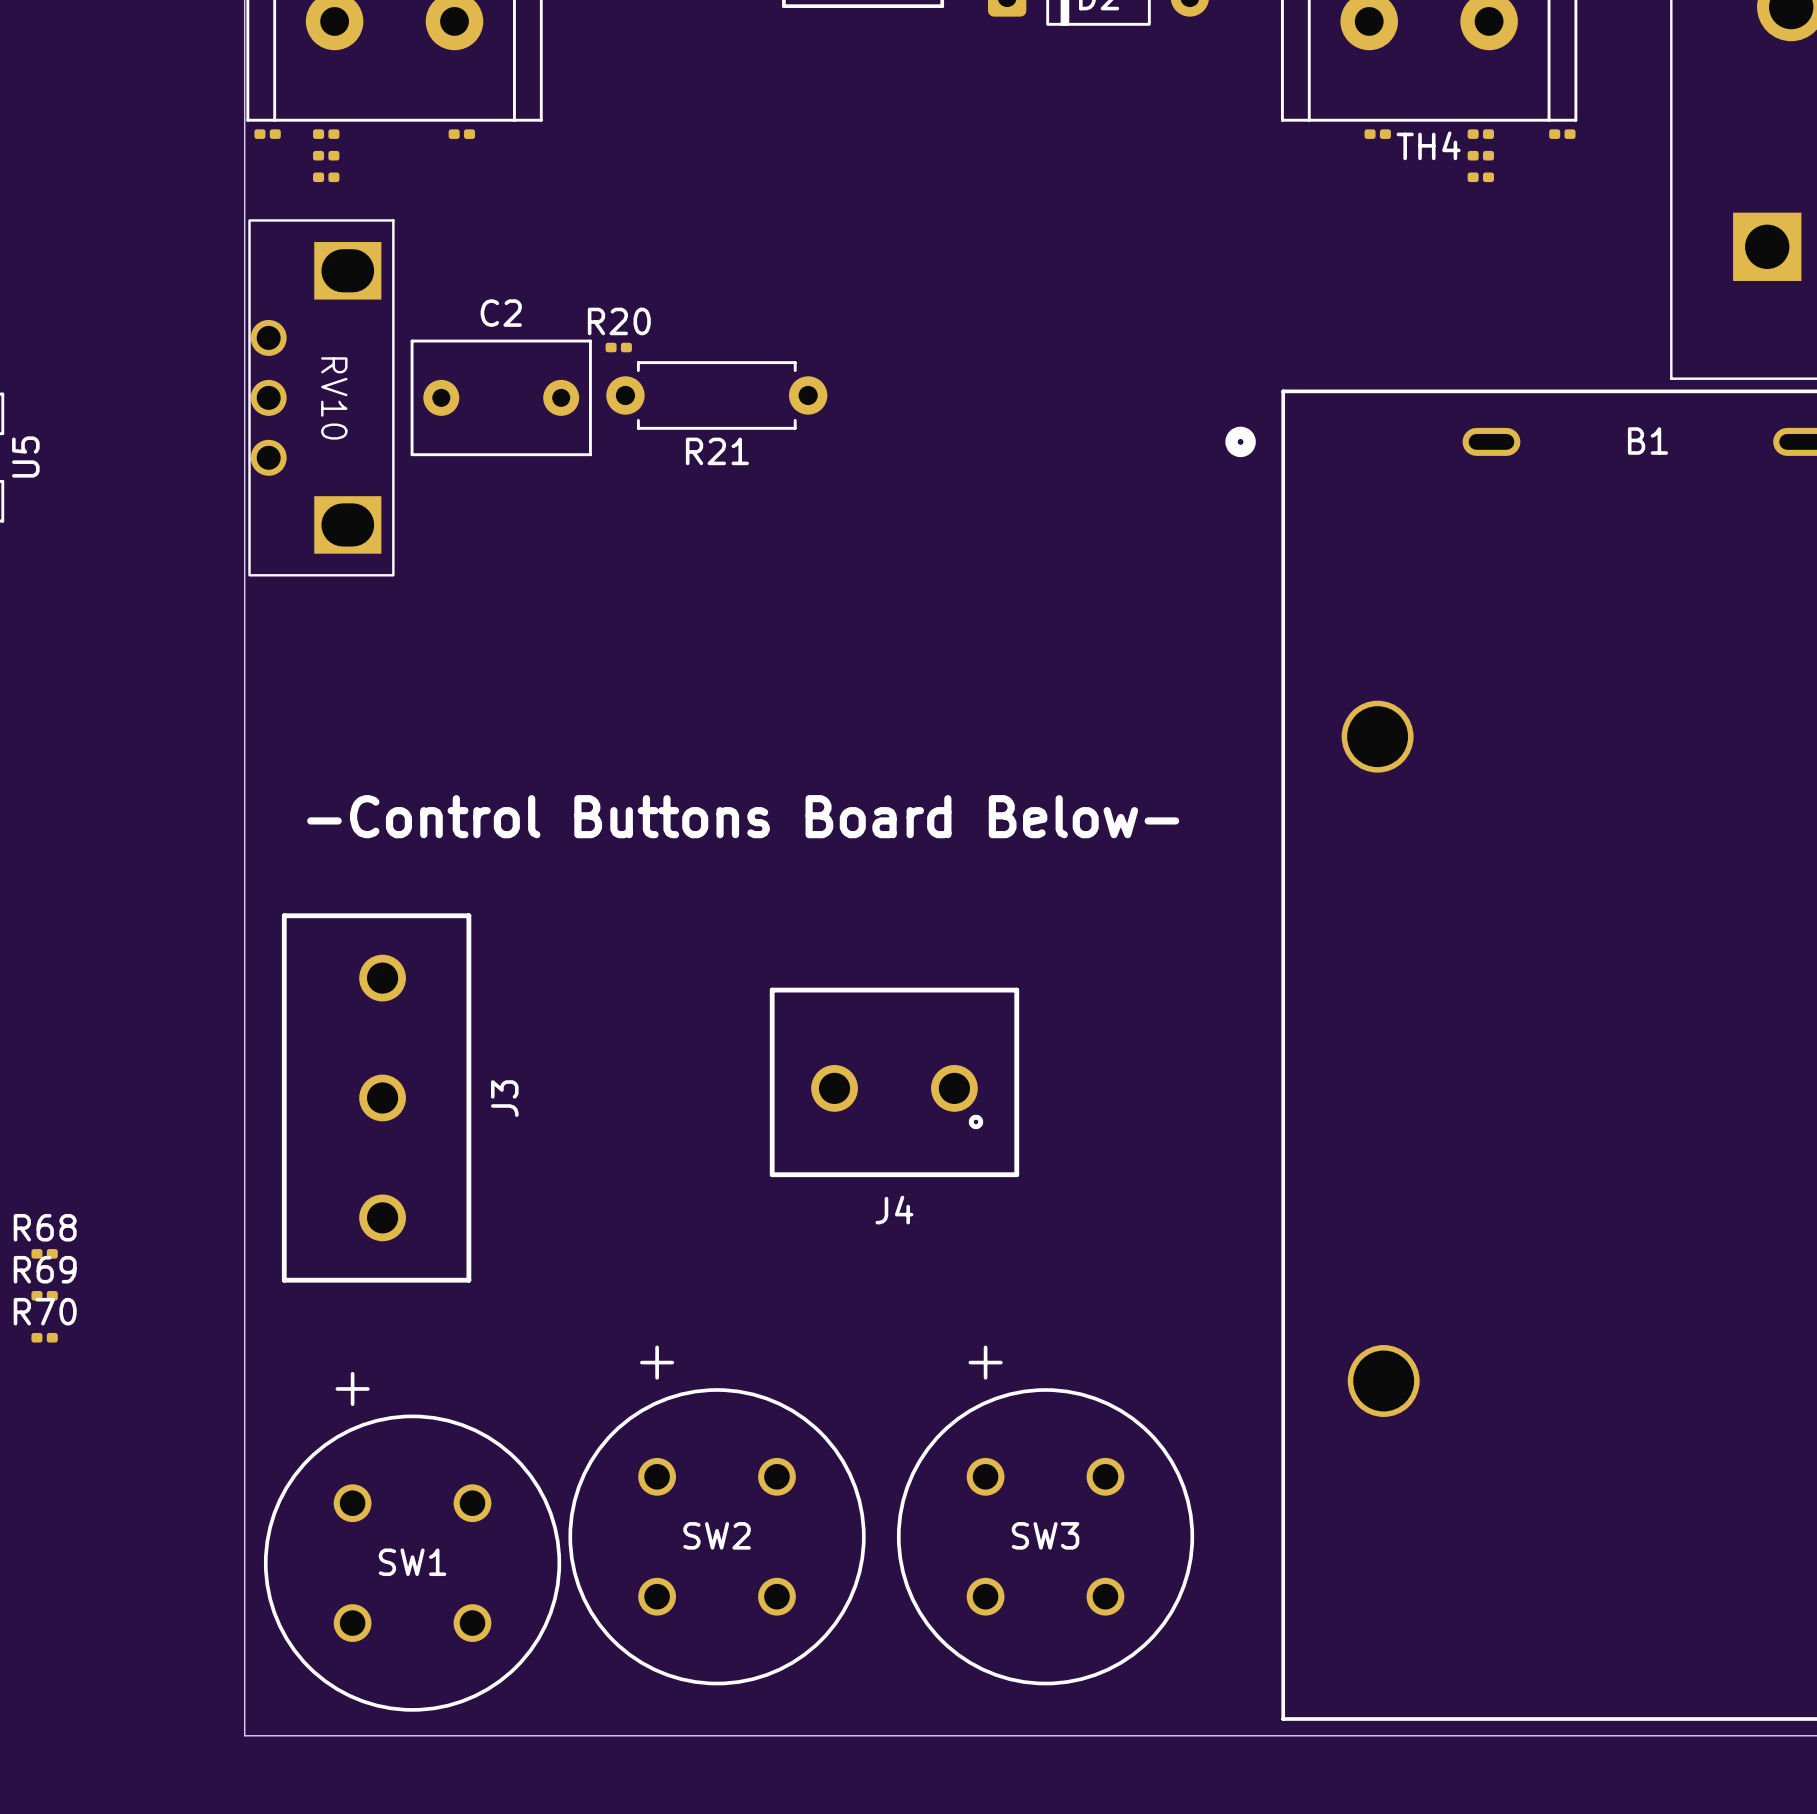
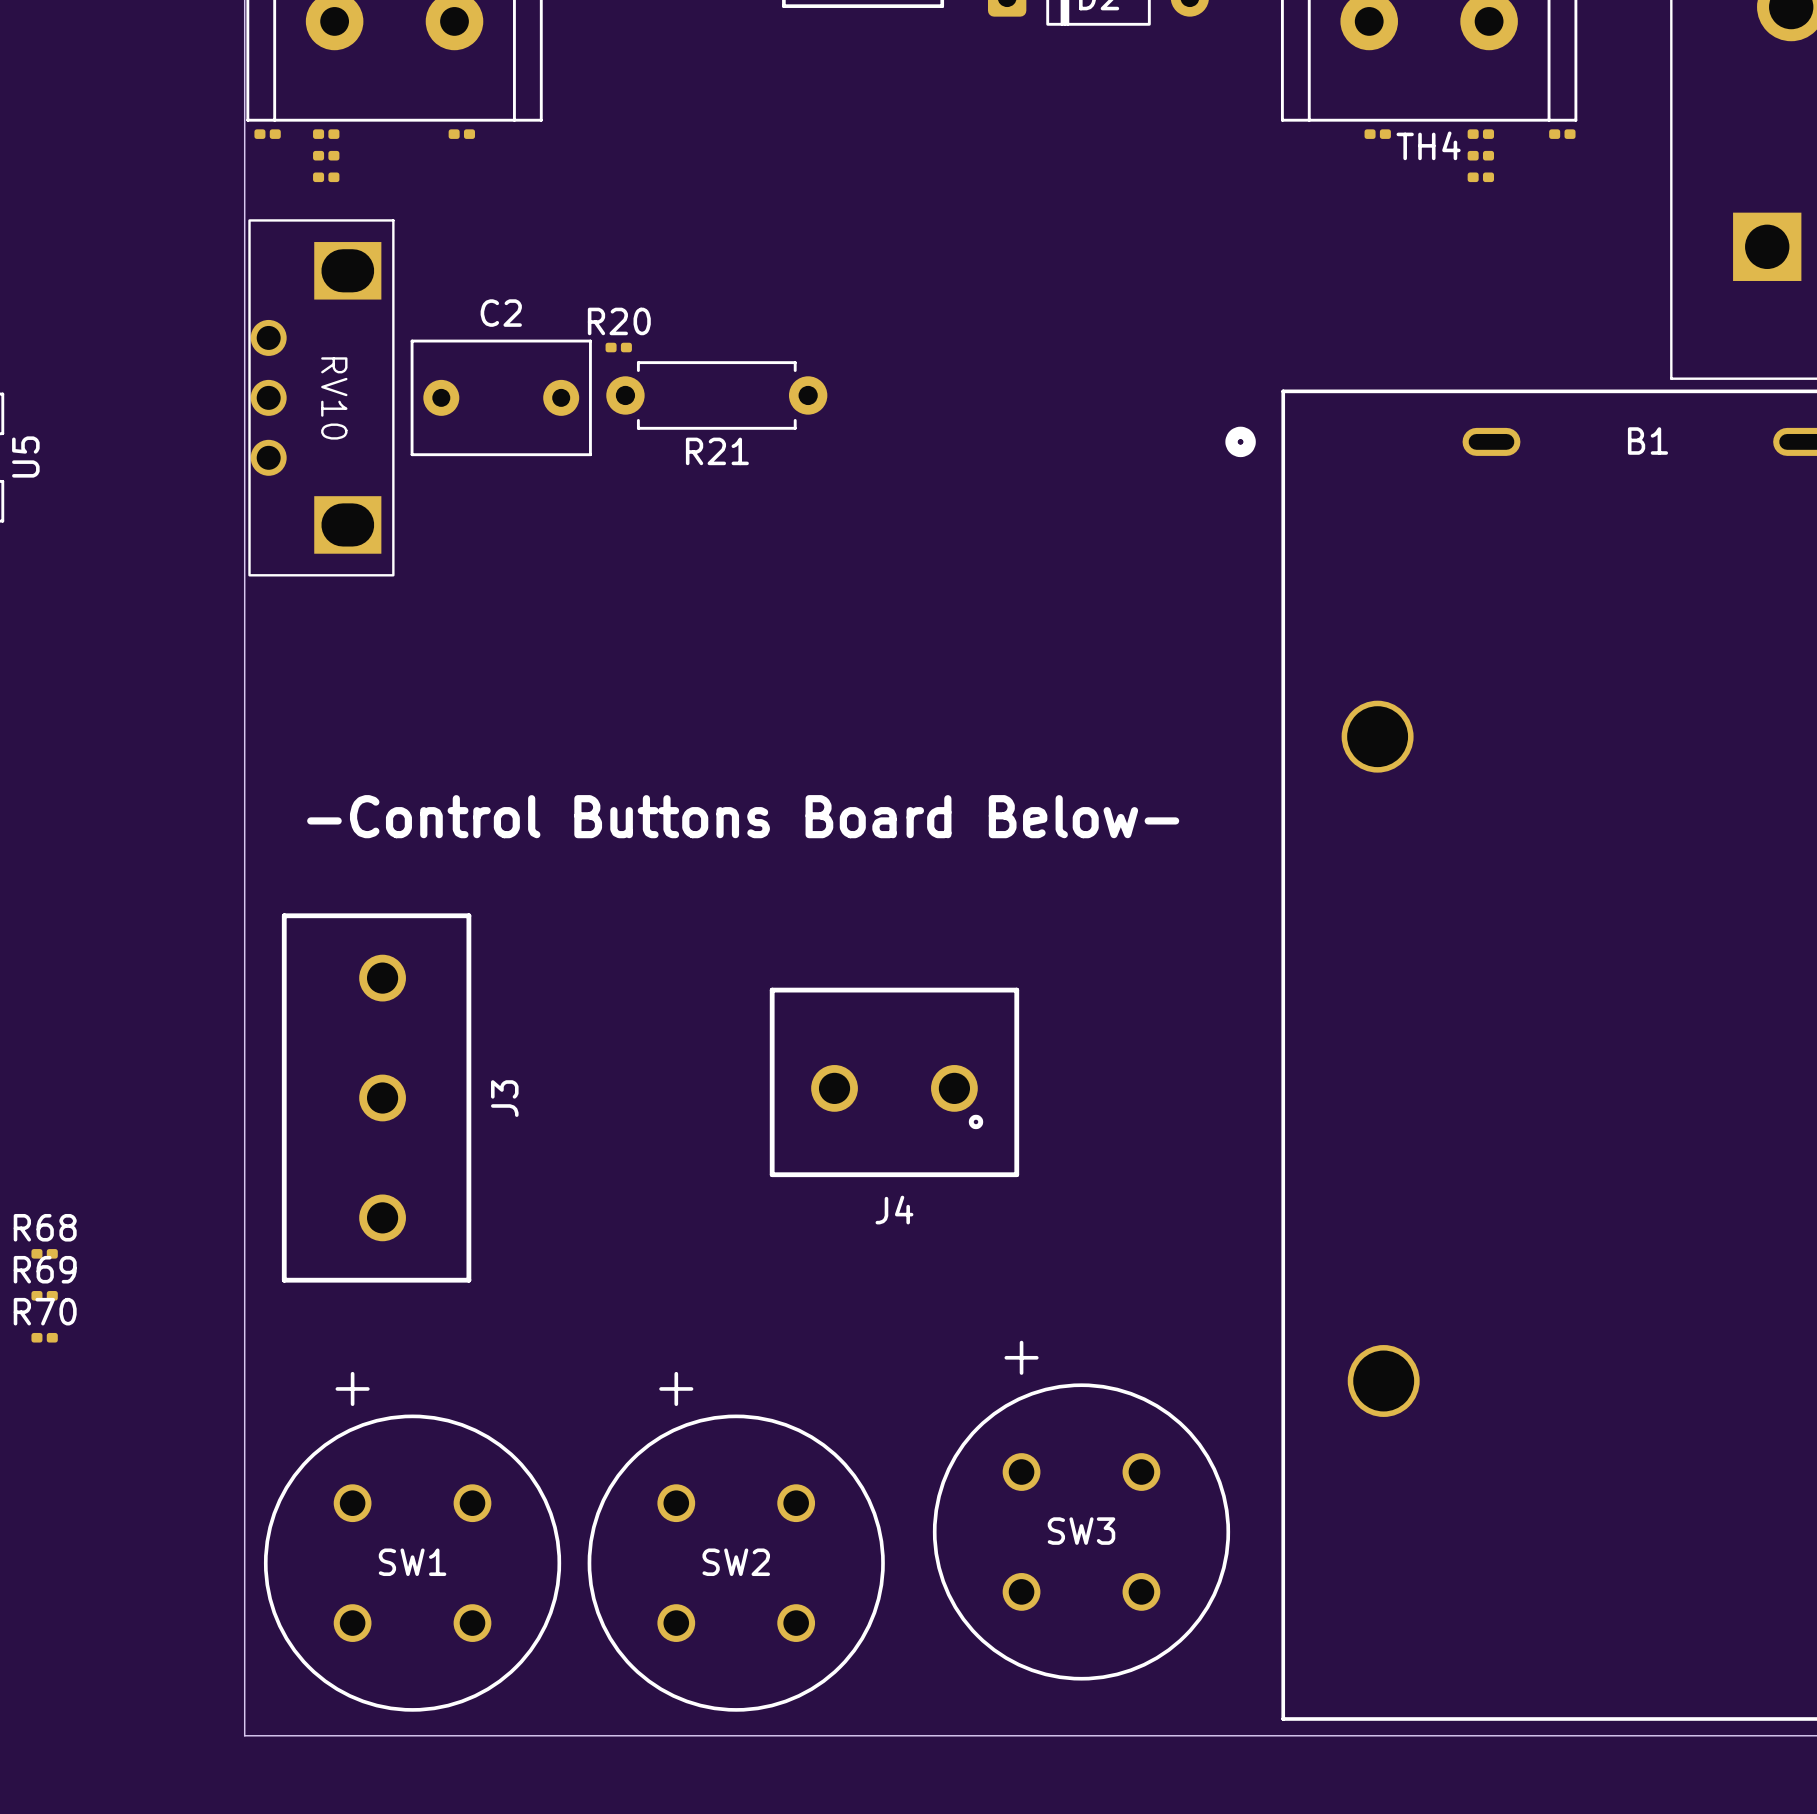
SW2 position: (717, 1515) -> (736, 1541)
SW3 position: (1045, 1515) -> (1081, 1510)

